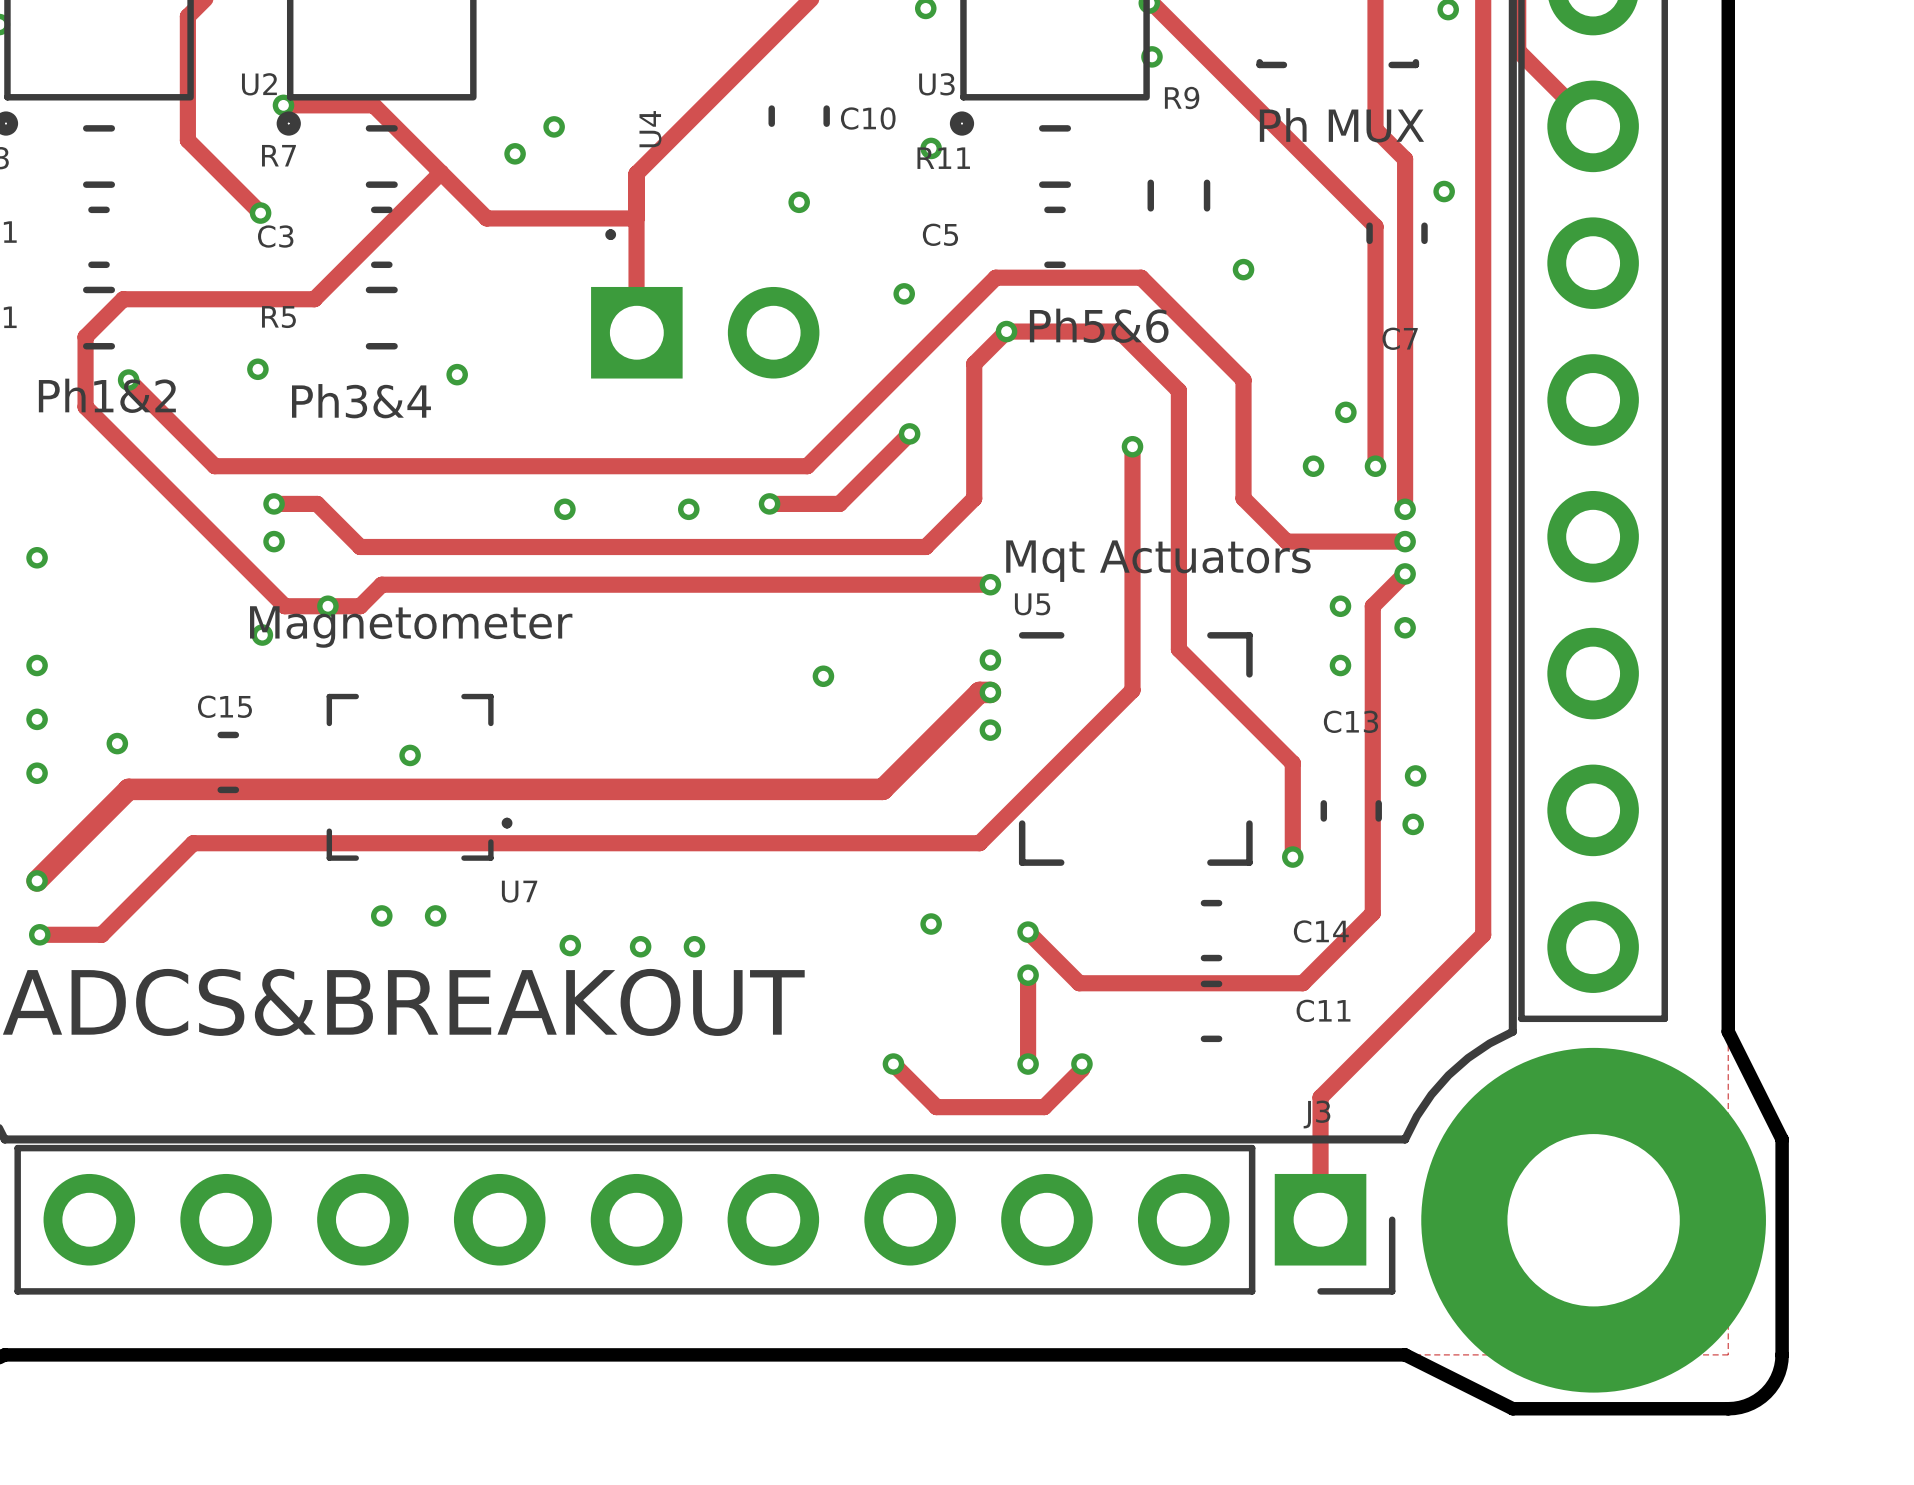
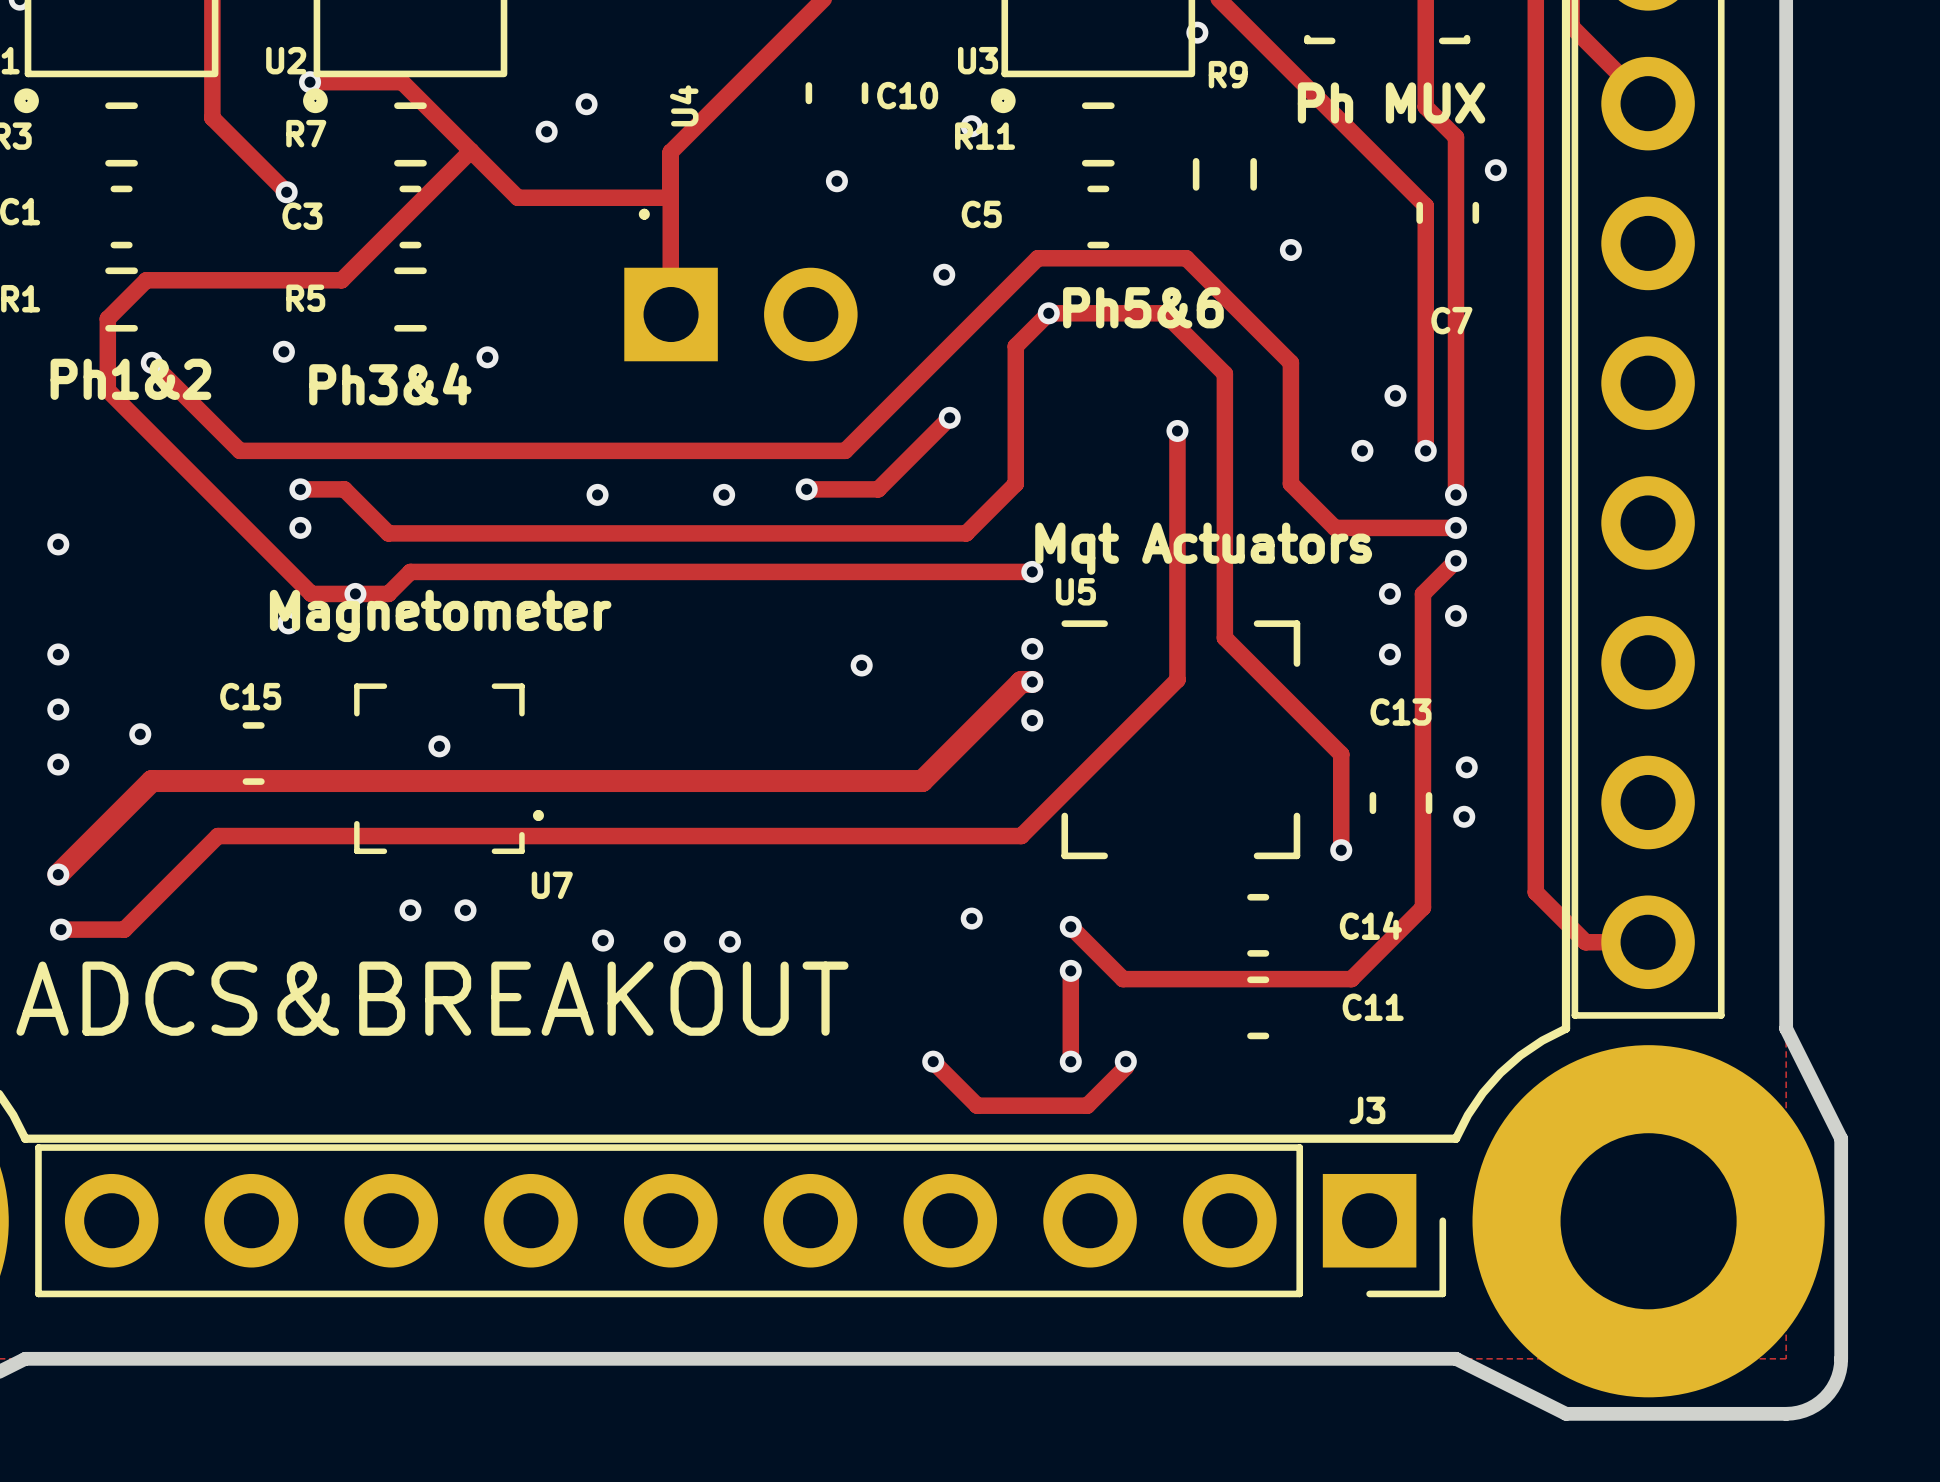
track: (1483, 898) (1483, 934) (1320, 1097) (1320, 1220) -> (1535, 892) (1585, 942) (1648, 942)

